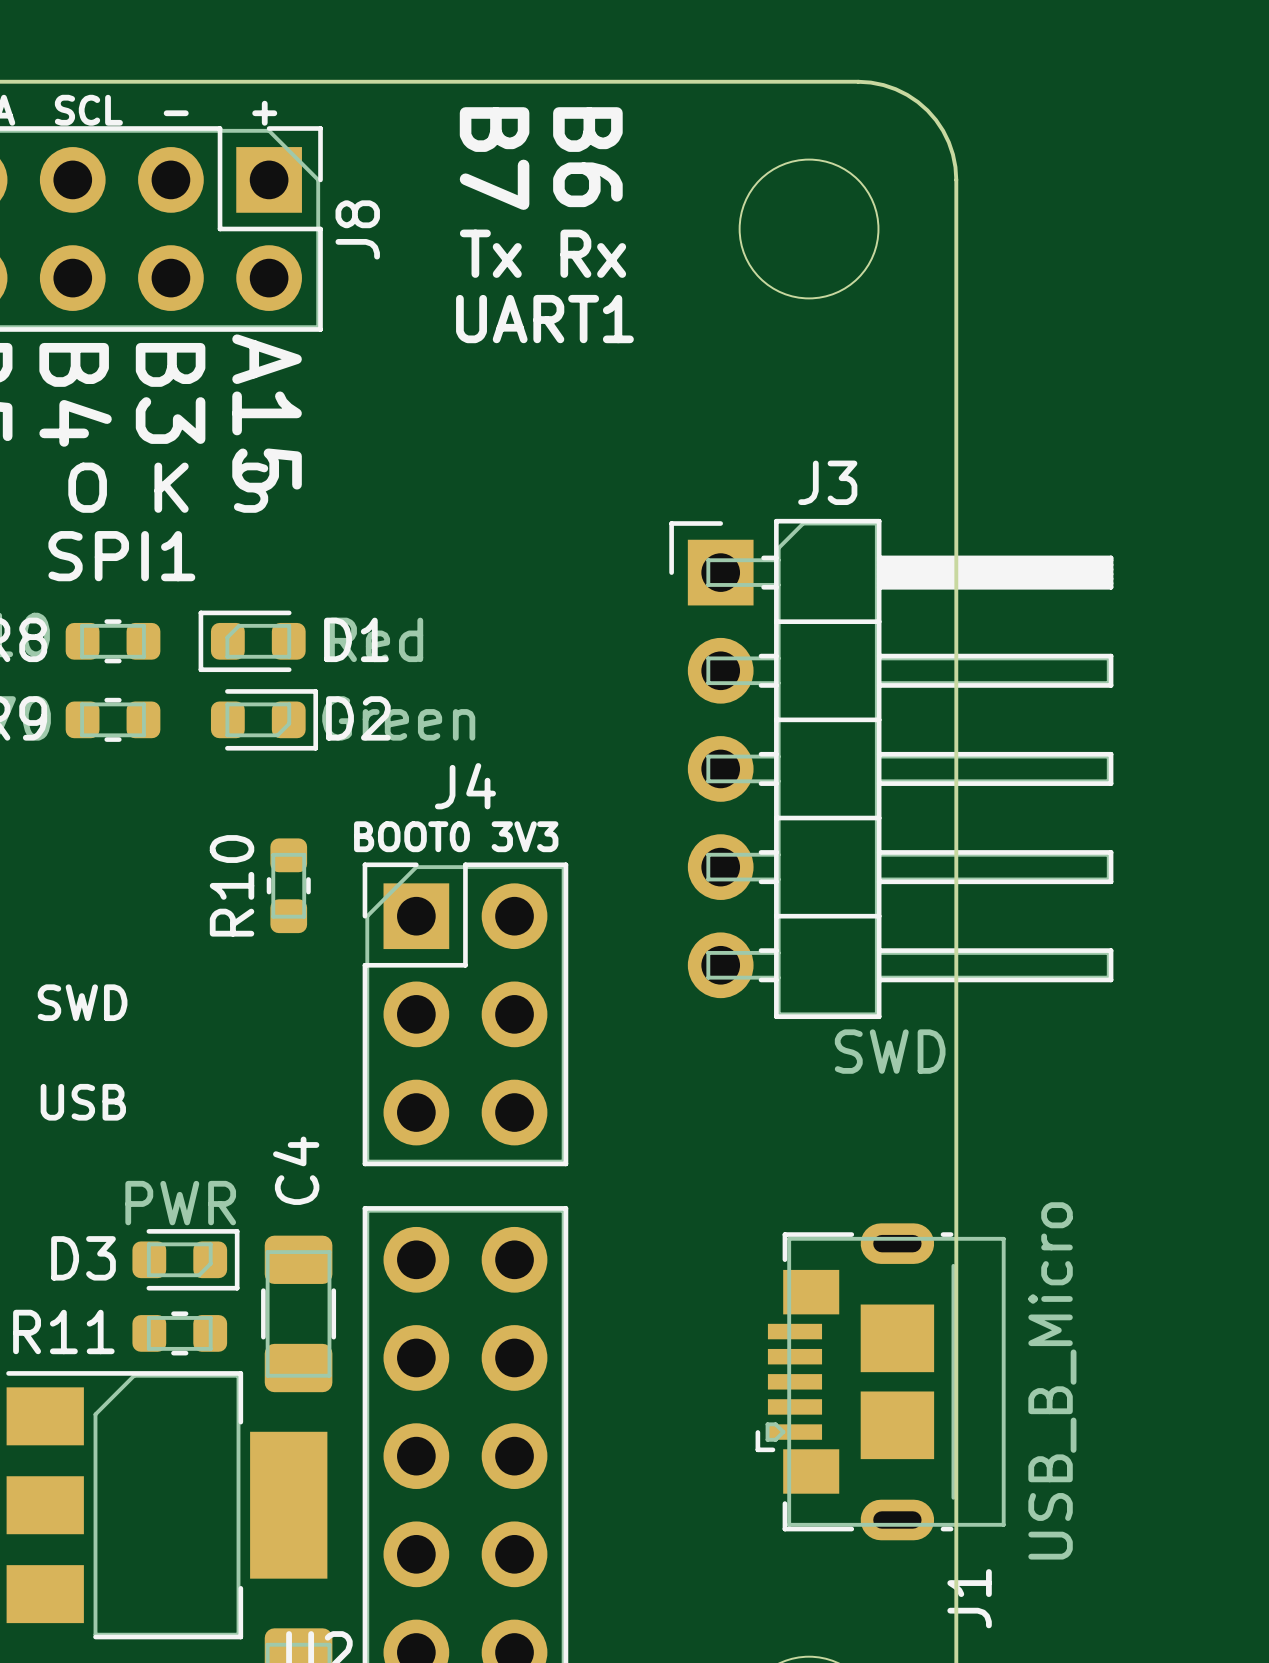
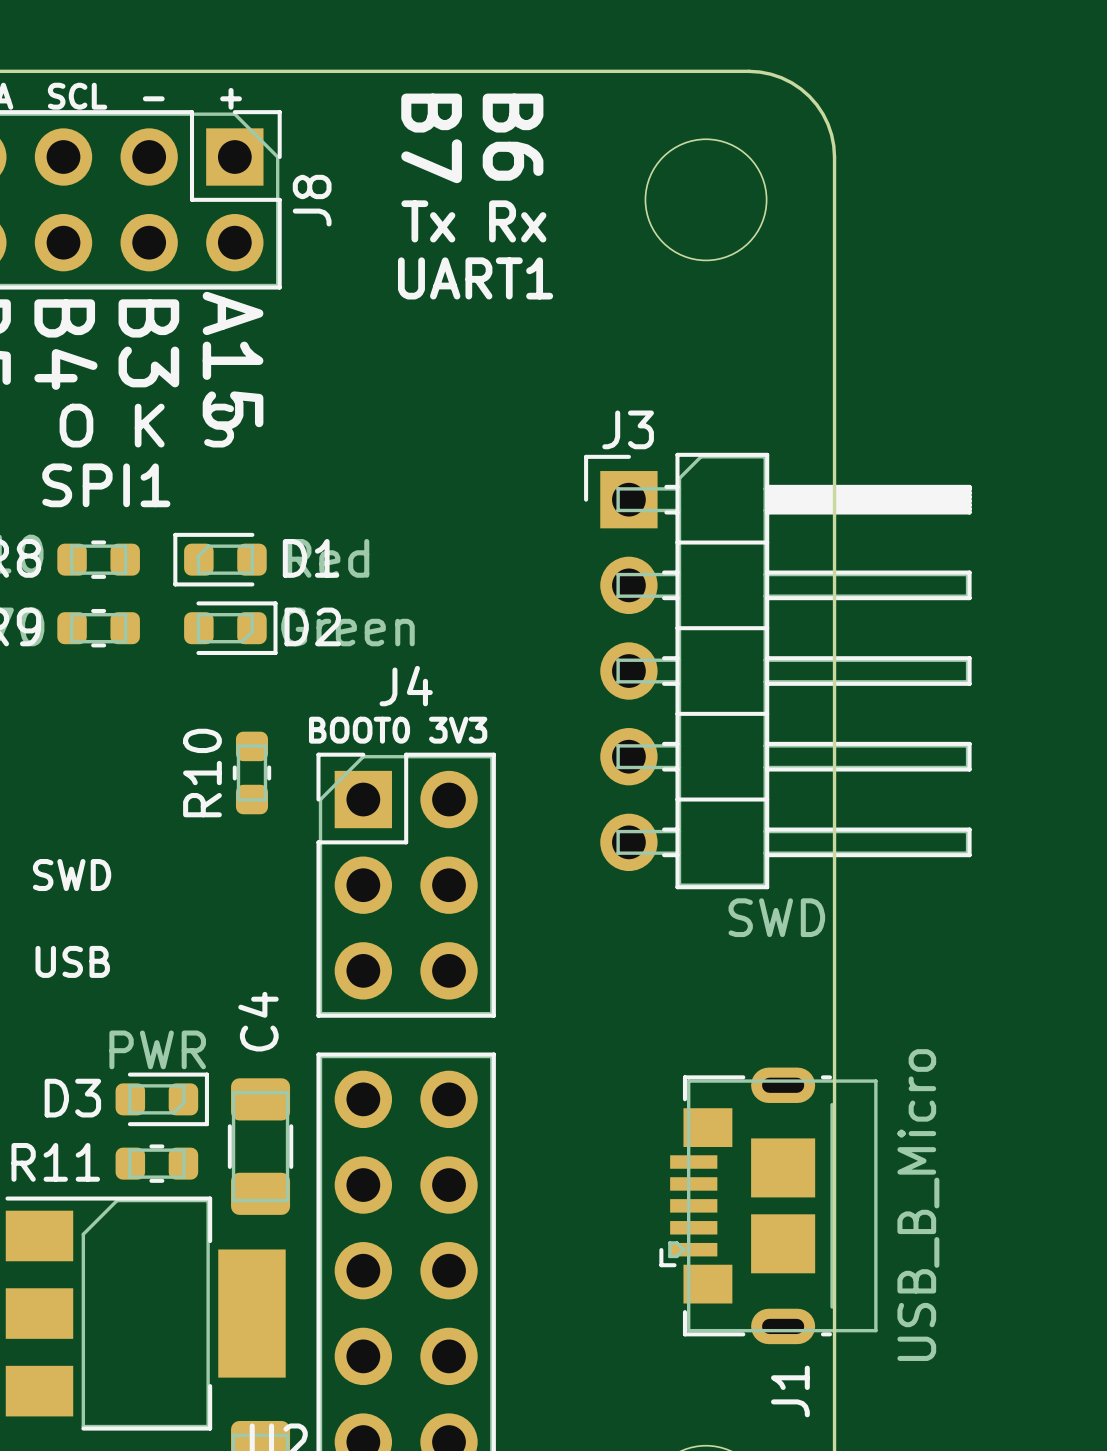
J3 name position: J3 (827, 482) -> J3 (628, 429)
J1 name position: J1 (969, 1598) -> J1 (790, 1391)

